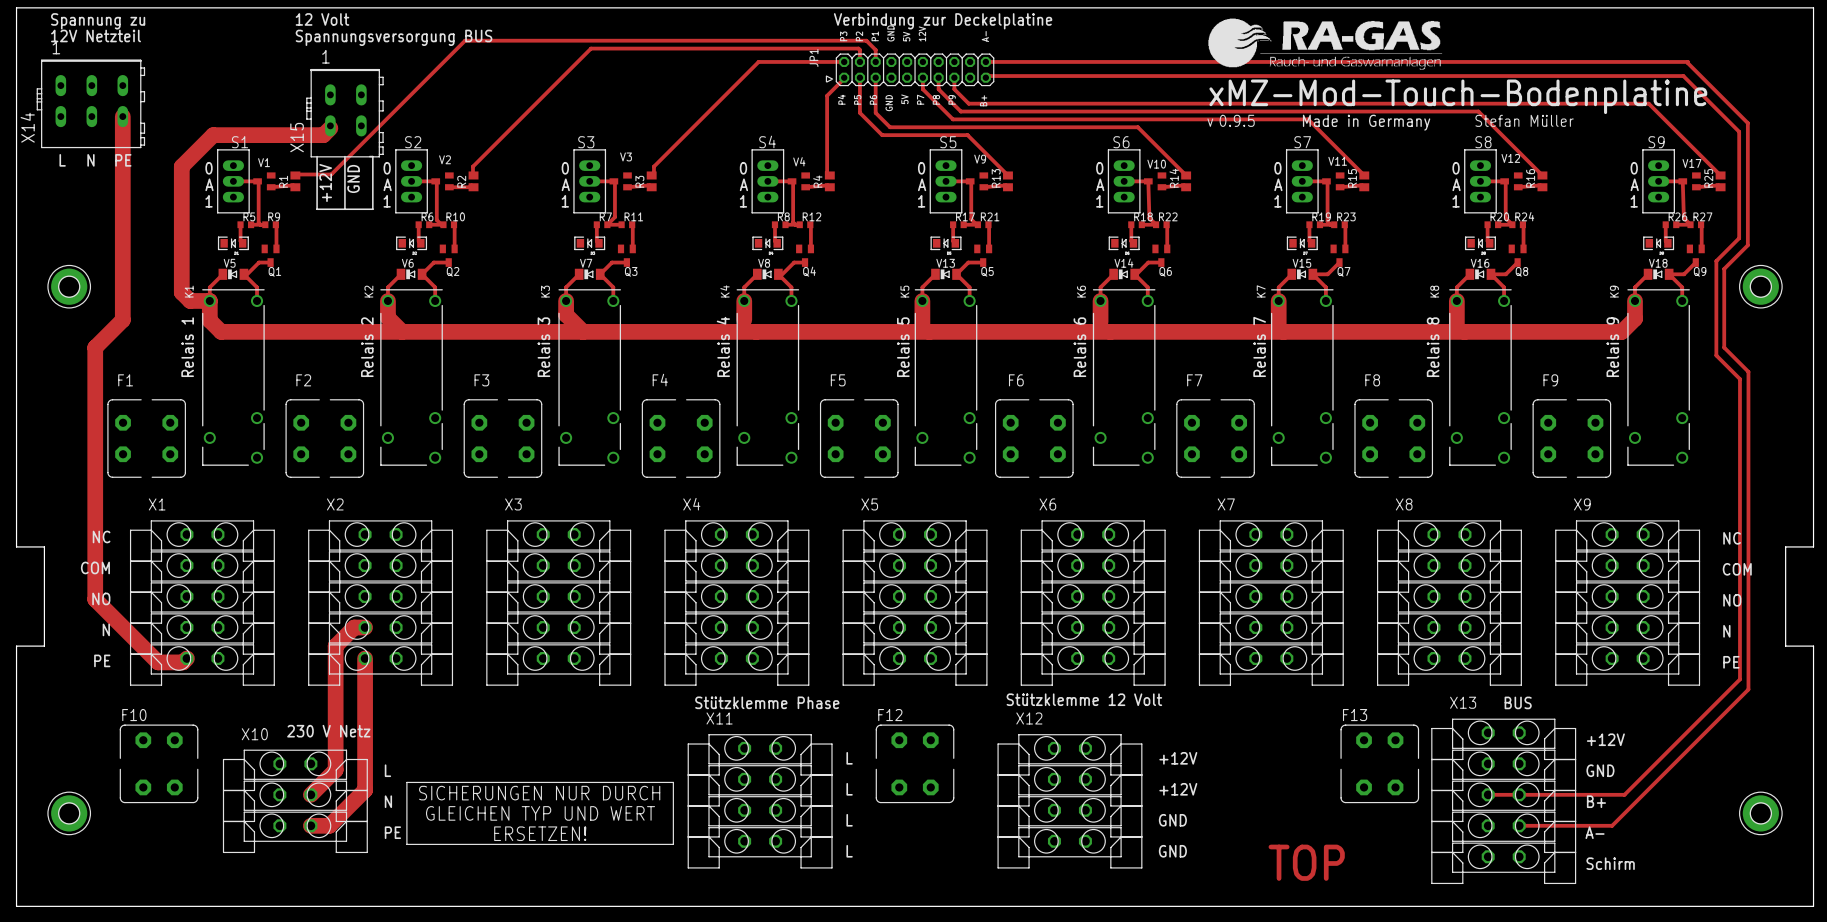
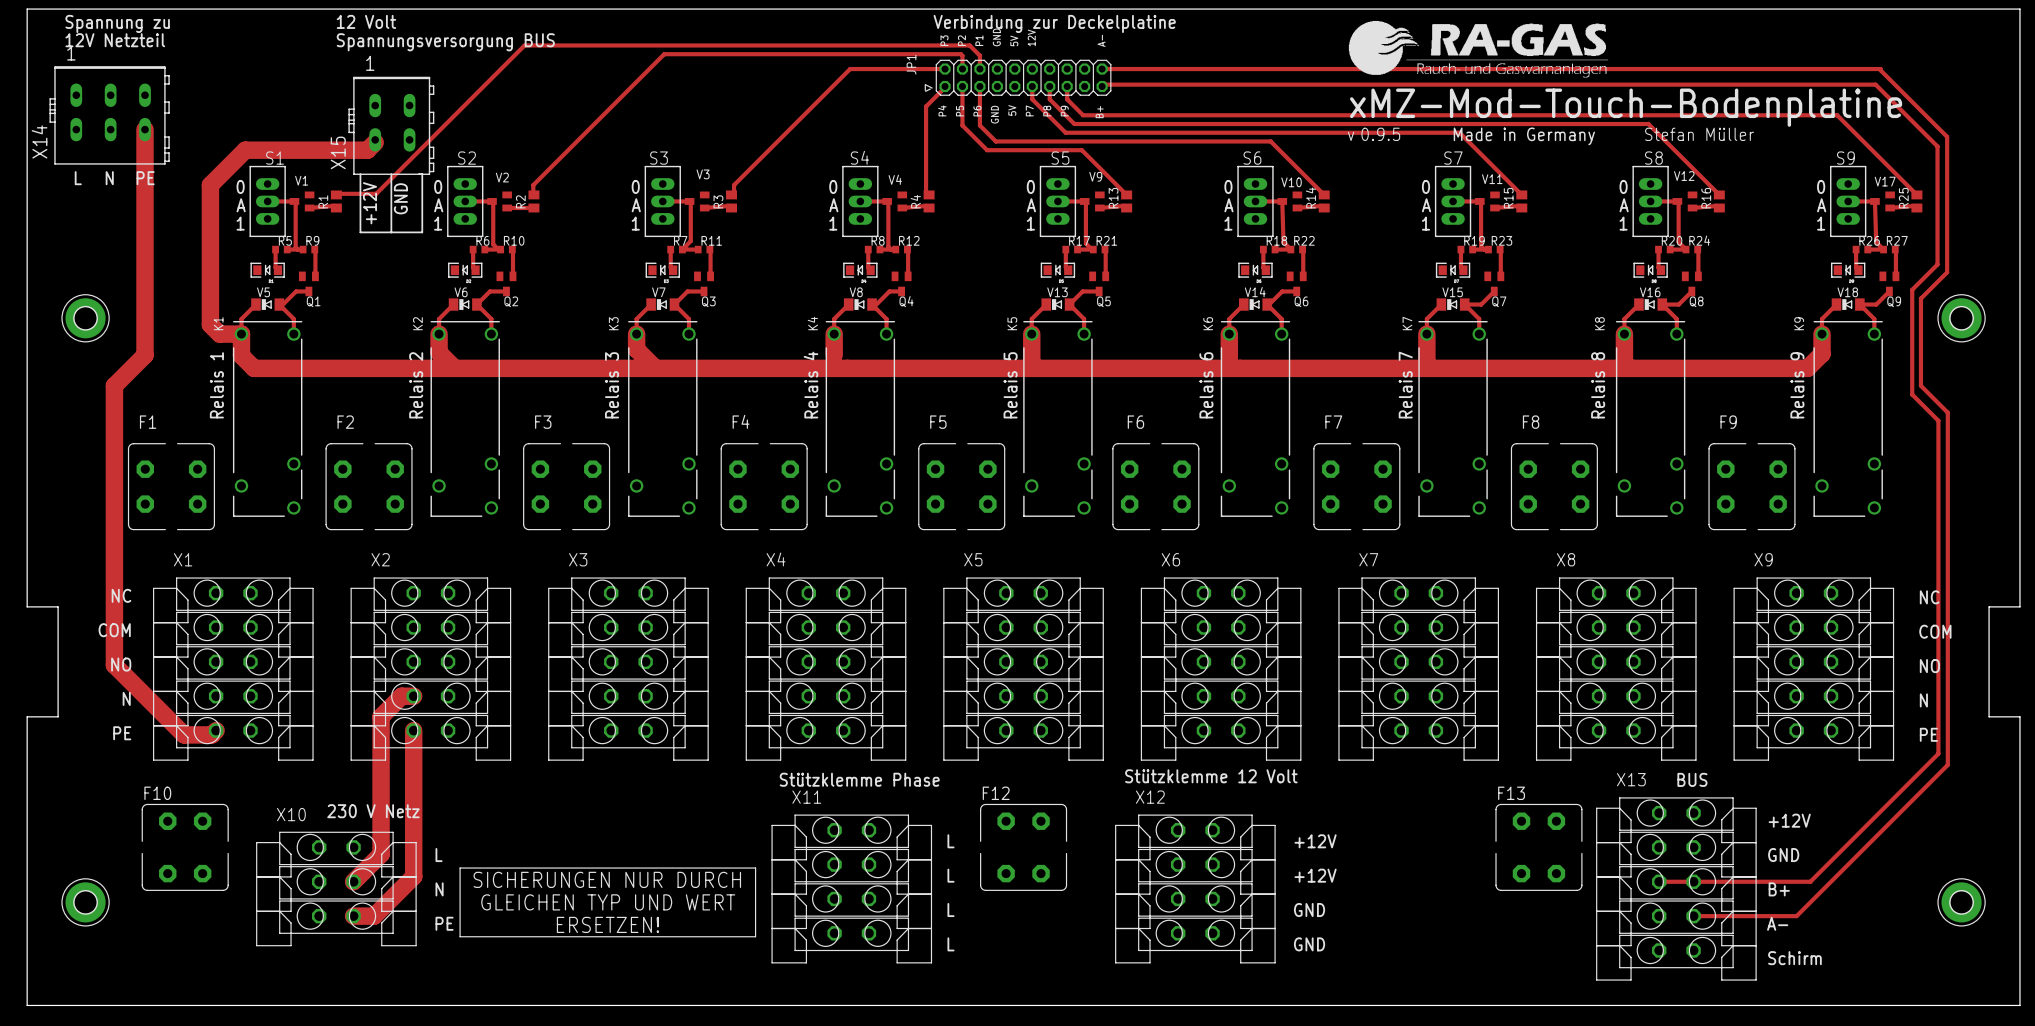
text: TOP (1306, 862) -> none

